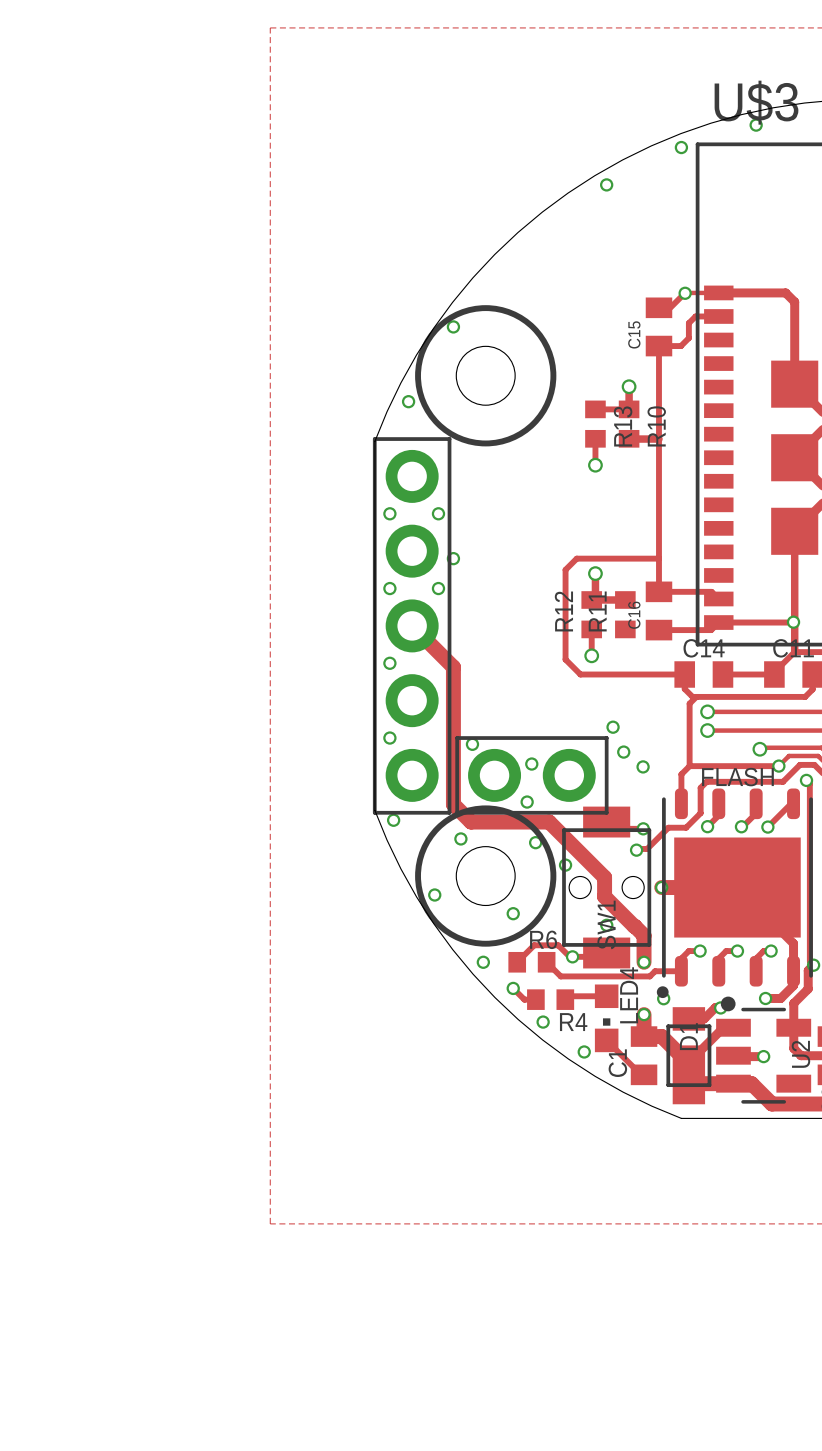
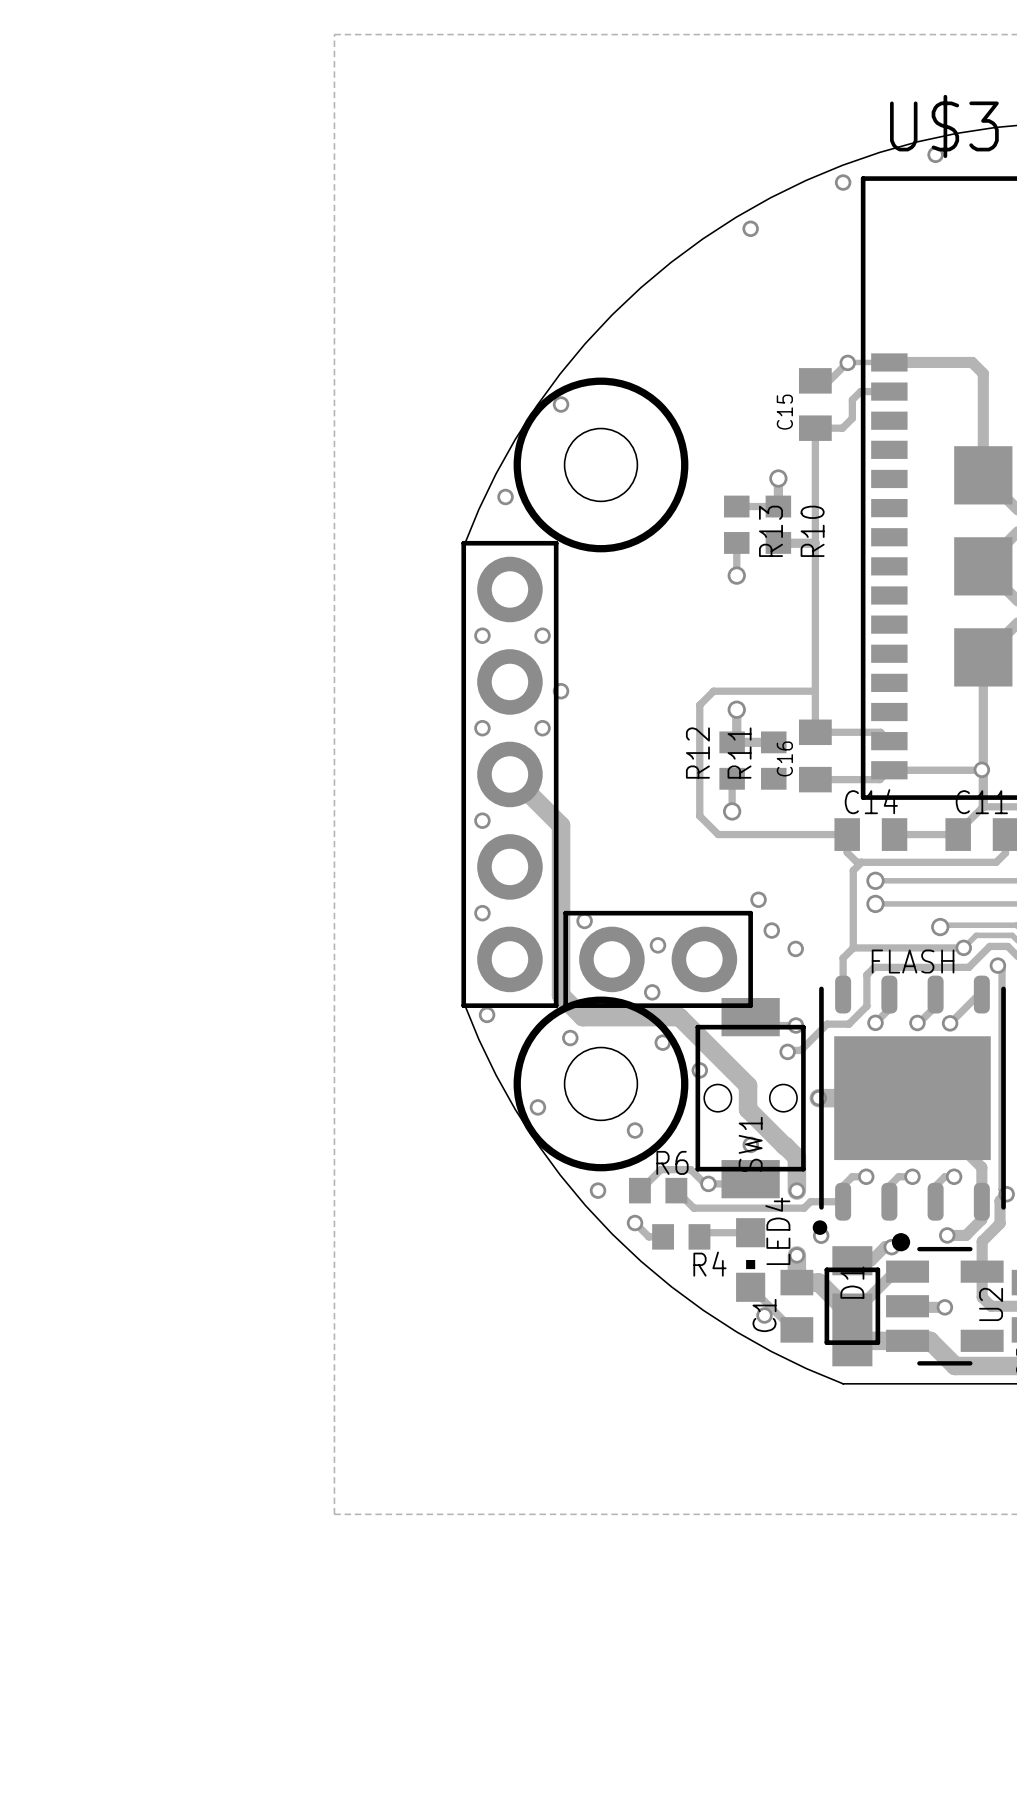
via: (543, 1022) -> none
via position: (584, 1051) -> (764, 1315)

